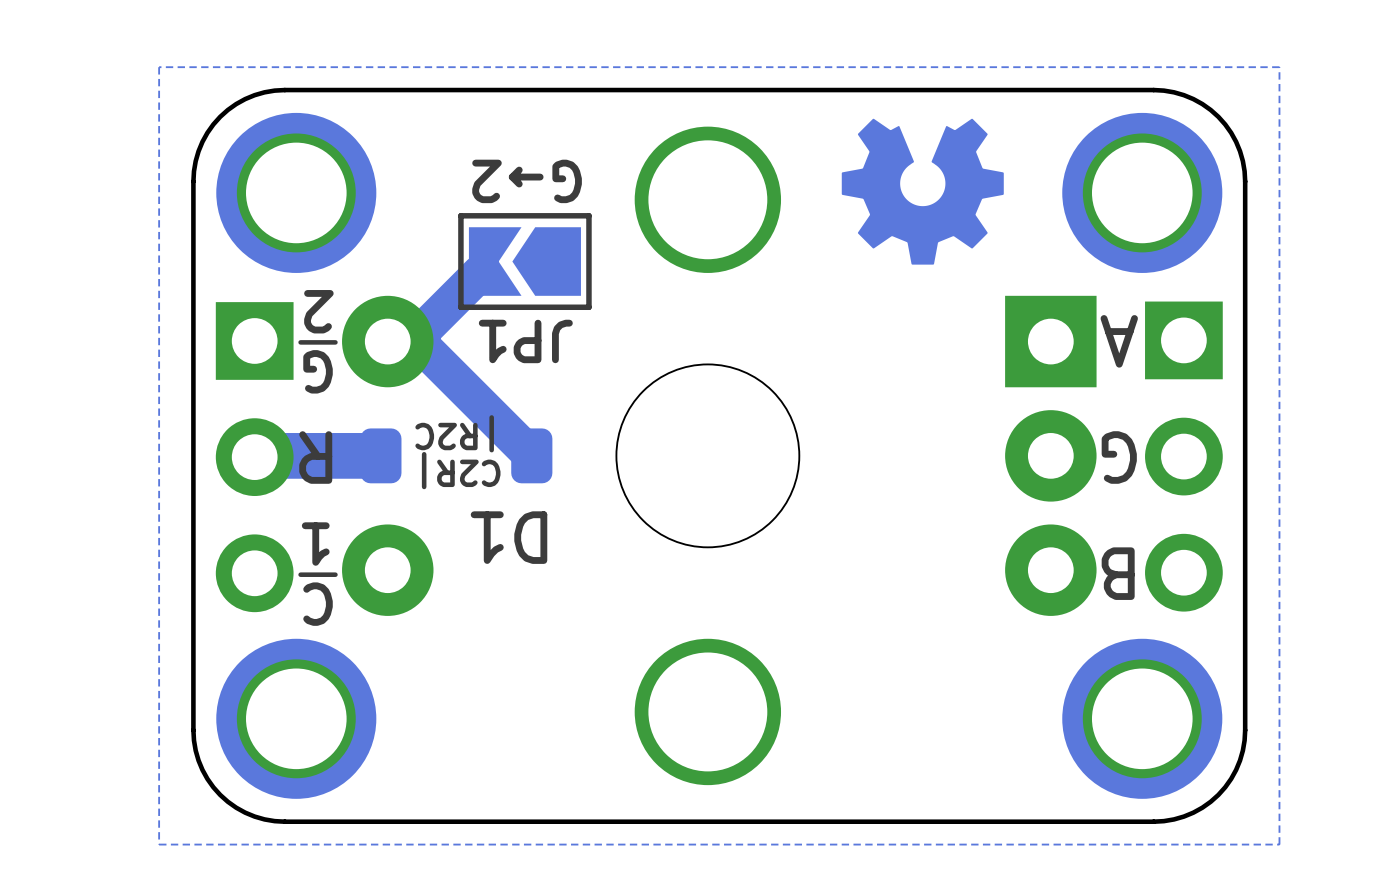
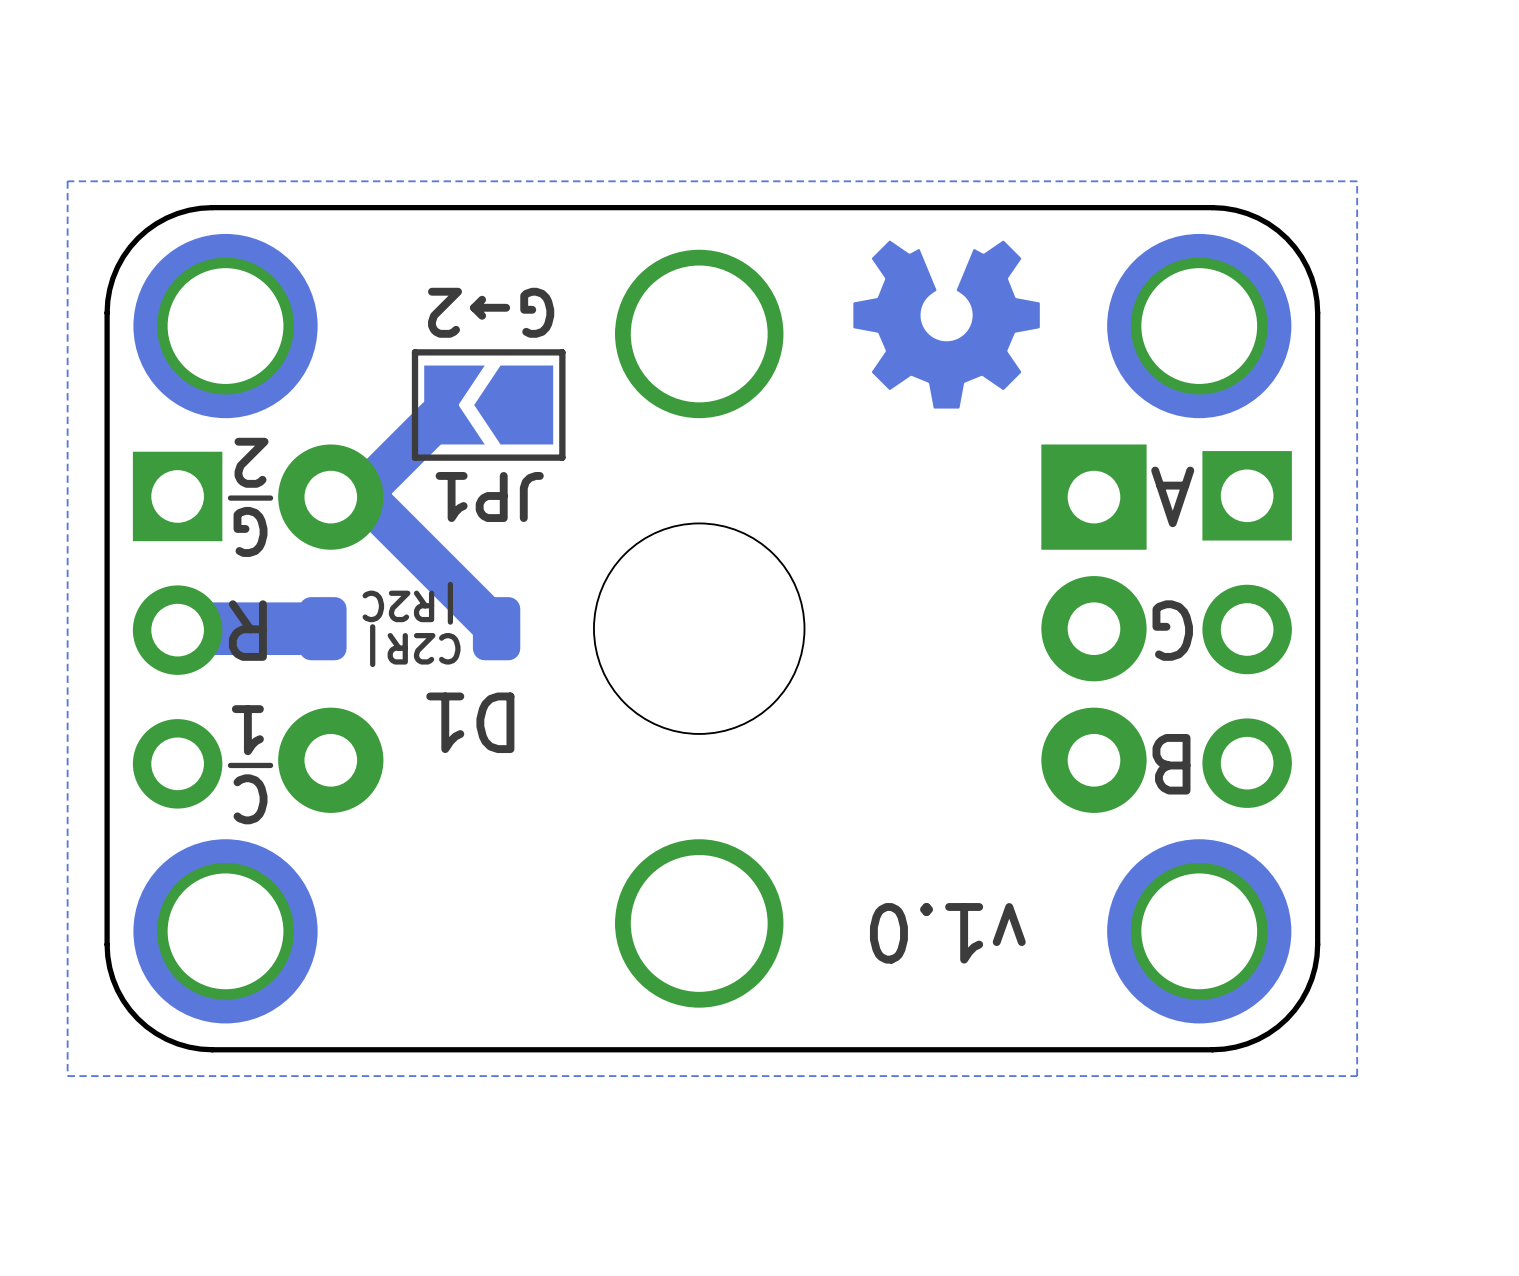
text: none -> v1.0 (947, 933)

